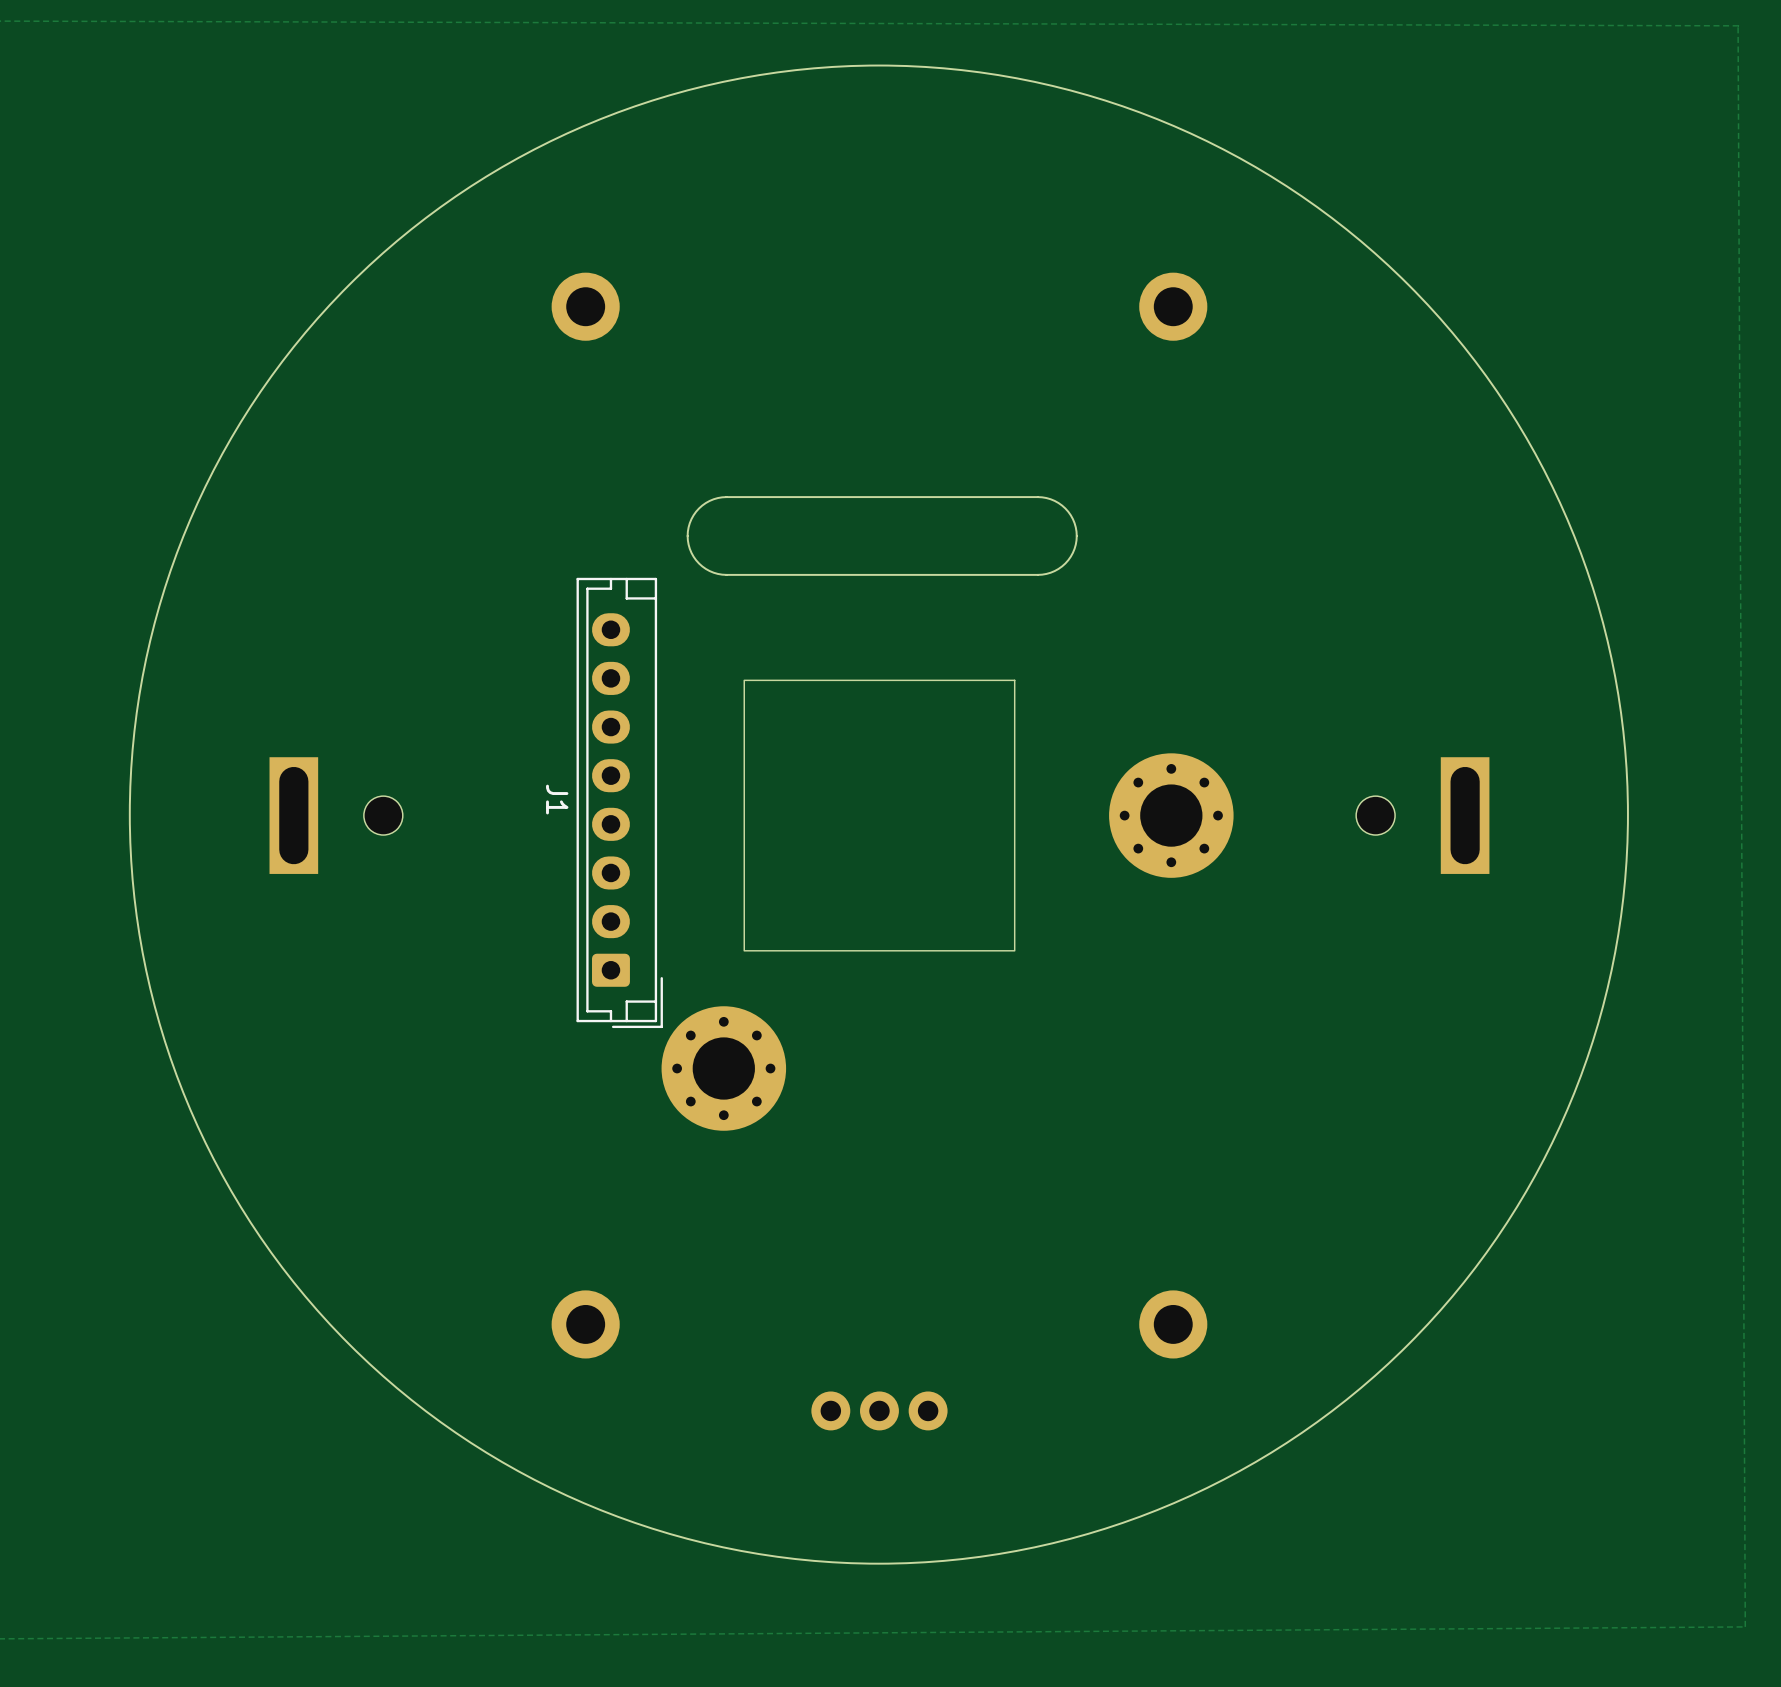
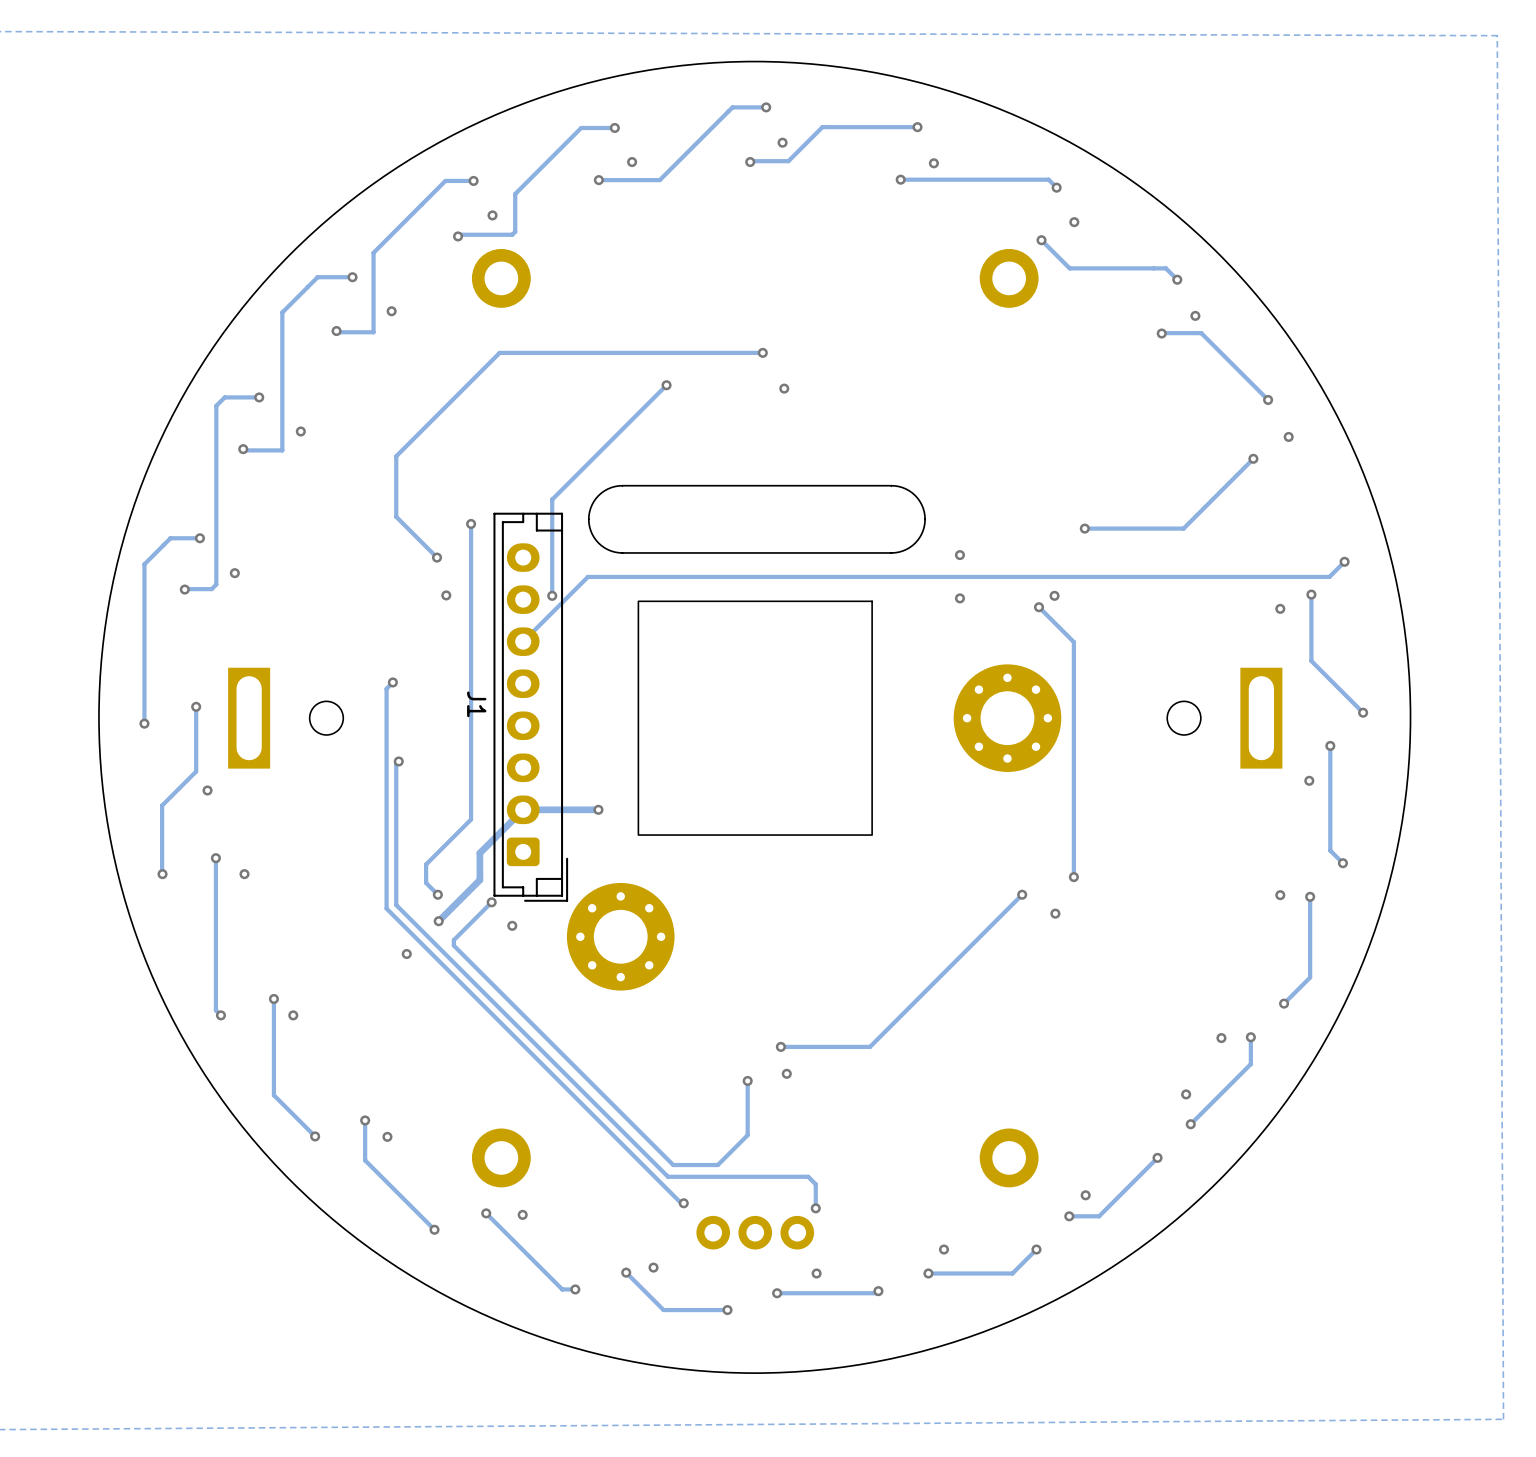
round board edge size: [128, 64, 1629, 1565] -> [98, 60, 1412, 1374]
track: none -> (766, 107) (732, 107) (659, 180) (598, 180)
via: none -> (766, 107)
track: none -> (917, 127) (822, 127) (788, 161) (750, 162)
via: none -> (917, 127)
track: none -> (614, 127) (581, 127) (515, 193) (515, 231) (512, 234) (459, 234) (458, 236)
via: none -> (614, 127)
via: none -> (782, 142)
via: none -> (632, 162)
via: none -> (750, 162)
via: none -> (933, 163)
via: none -> (598, 180)
track: none -> (900, 179) (1048, 179) (1056, 187)
via: none -> (900, 179)
track: none -> (473, 180) (445, 180) (373, 252) (373, 332) (336, 331)
via: none -> (473, 180)
via: none -> (1056, 187)
via: none -> (492, 215)
via: none -> (1074, 222)
via: none -> (458, 236)
track: none -> (1041, 240) (1069, 268) (1165, 268) (1177, 279)
via: none -> (1041, 240)
track: none -> (352, 277) (317, 277) (282, 312) (282, 450) (243, 449)
via: none -> (352, 277)
via: none -> (1177, 279)
via: none -> (391, 311)
via: none -> (1195, 315)
via: none -> (336, 331)
track: none -> (1161, 333) (1201, 333) (1268, 399)
via: none -> (1161, 333)
track: none -> (762, 352) (499, 352) (396, 456) (396, 516) (437, 557)
via: none -> (762, 352)
track: none -> (666, 385) (552, 499) (552, 595)
via: none -> (666, 385)
via: none -> (784, 388)
track: none -> (259, 397) (224, 397) (216, 405) (216, 584) (211, 589) (184, 589)
via: none -> (259, 397)
via: none -> (1268, 399)
via: none -> (300, 431)
via: none -> (1288, 436)
board edge: (1037, 497) (722, 497) (709, 500) (696, 511) (689, 523) (687, 540) (691, 552) (699, 563) (709, 571) (722, 574) (1042, 574) (1054, 571) (1068, 560) (1074, 548) (1076, 531) (1070, 515) (1062, 505) (1050, 499) (1037, 497) -> (891, 485) (618, 485) (604, 490) (596, 498) (590, 508) (589, 523) (592, 533) (598, 543) (607, 549) (618, 552) (895, 552) (906, 549) (917, 540) (923, 530) (924, 515) (921, 504) (915, 495) (906, 489) (891, 485)
via: none -> (243, 449)
track: none -> (1253, 458) (1183, 528) (1084, 528)
via: none -> (1253, 458)
track: none -> (471, 523) (471, 819) (426, 864) (426, 882) (437, 894)
via: none -> (471, 523)
via: none -> (1084, 528)
track: none -> (199, 538) (170, 538) (144, 564) (144, 723)
via: none -> (199, 538)
via: none -> (959, 555)
via: none -> (437, 557)
track: none -> (1344, 561) (1329, 576) (587, 576) (523, 641)
via: none -> (1344, 561)
via: none -> (234, 573)
via: none -> (184, 589)
track: none -> (1311, 594) (1311, 661) (1363, 712)
via: none -> (1311, 594)
via: none -> (446, 595)
via: none -> (552, 595)
via: none -> (1054, 595)
via: none -> (959, 598)
track: none -> (1039, 607) (1073, 642) (1073, 877)
via: none -> (1039, 607)
via: none -> (1280, 608)
track: none -> (392, 682) (386, 688) (386, 908) (681, 1203) (683, 1203)
via: none -> (392, 682)
track: none -> (196, 706) (196, 771) (162, 805) (162, 874)
via: none -> (196, 706)
via: none -> (1363, 712)
via: none -> (144, 723)
track: none -> (1330, 745) (1330, 850) (1342, 863)
via: none -> (1330, 745)
track: none -> (398, 761) (396, 764) (396, 905) (668, 1176) (808, 1176) (815, 1184) (815, 1208)
via: none -> (398, 761)
via: none -> (1309, 780)
via: none -> (207, 790)
track: none -> (598, 809) (523, 809) (479, 853) (479, 880) (438, 921)
via: none -> (598, 809)
track: none -> (215, 858) (215, 1010) (220, 1015)
via: none -> (215, 858)
via: none -> (1342, 863)
via: none -> (162, 874)
via: none -> (244, 874)
via: none -> (1073, 877)
via: none -> (437, 894)
track: none -> (1022, 894) (870, 1046) (780, 1046)
via: none -> (1022, 894)
via: none -> (1280, 895)
track: none -> (1310, 896) (1310, 977) (1284, 1003)
via: none -> (1310, 896)
track: none -> (491, 902) (453, 940) (453, 945) (673, 1165) (717, 1165) (747, 1135) (747, 1080)
via: none -> (491, 902)
via: none -> (1055, 913)
via: none -> (438, 921)
via: none -> (512, 925)
via: none -> (406, 954)
track: none -> (273, 998) (273, 1095) (315, 1136)
via: none -> (273, 998)
via: none -> (1284, 1003)
via: none -> (220, 1015)
via: none -> (293, 1015)
track: none -> (1250, 1037) (1250, 1064) (1190, 1124)
via: none -> (1250, 1037)
via: none -> (1221, 1038)
via: none -> (780, 1046)
via: none -> (786, 1073)
via: none -> (747, 1080)
via: none -> (1186, 1094)
track: none -> (365, 1120) (365, 1160) (434, 1229)
via: none -> (365, 1120)
via: none -> (1190, 1124)
via: none -> (315, 1136)
via: none -> (387, 1136)
track: none -> (1157, 1157) (1099, 1216) (1069, 1216)
via: none -> (1157, 1157)
via: none -> (1085, 1195)
via: none -> (683, 1203)
via: none -> (815, 1208)
track: none -> (486, 1213) (562, 1289) (575, 1289)
via: none -> (486, 1213)
via: none -> (522, 1214)
via: none -> (1069, 1216)
via: none -> (434, 1229)
via: none -> (944, 1249)
track: none -> (1036, 1249) (1012, 1273) (928, 1273)
via: none -> (1036, 1249)
via: none -> (653, 1267)
track: none -> (626, 1272) (663, 1310) (727, 1310)
via: none -> (626, 1272)
via: none -> (816, 1273)
via: none -> (928, 1273)
via: none -> (575, 1289)
track: none -> (878, 1291) (876, 1293) (777, 1293)
via: none -> (878, 1291)
via: none -> (777, 1293)
via: none -> (727, 1310)

